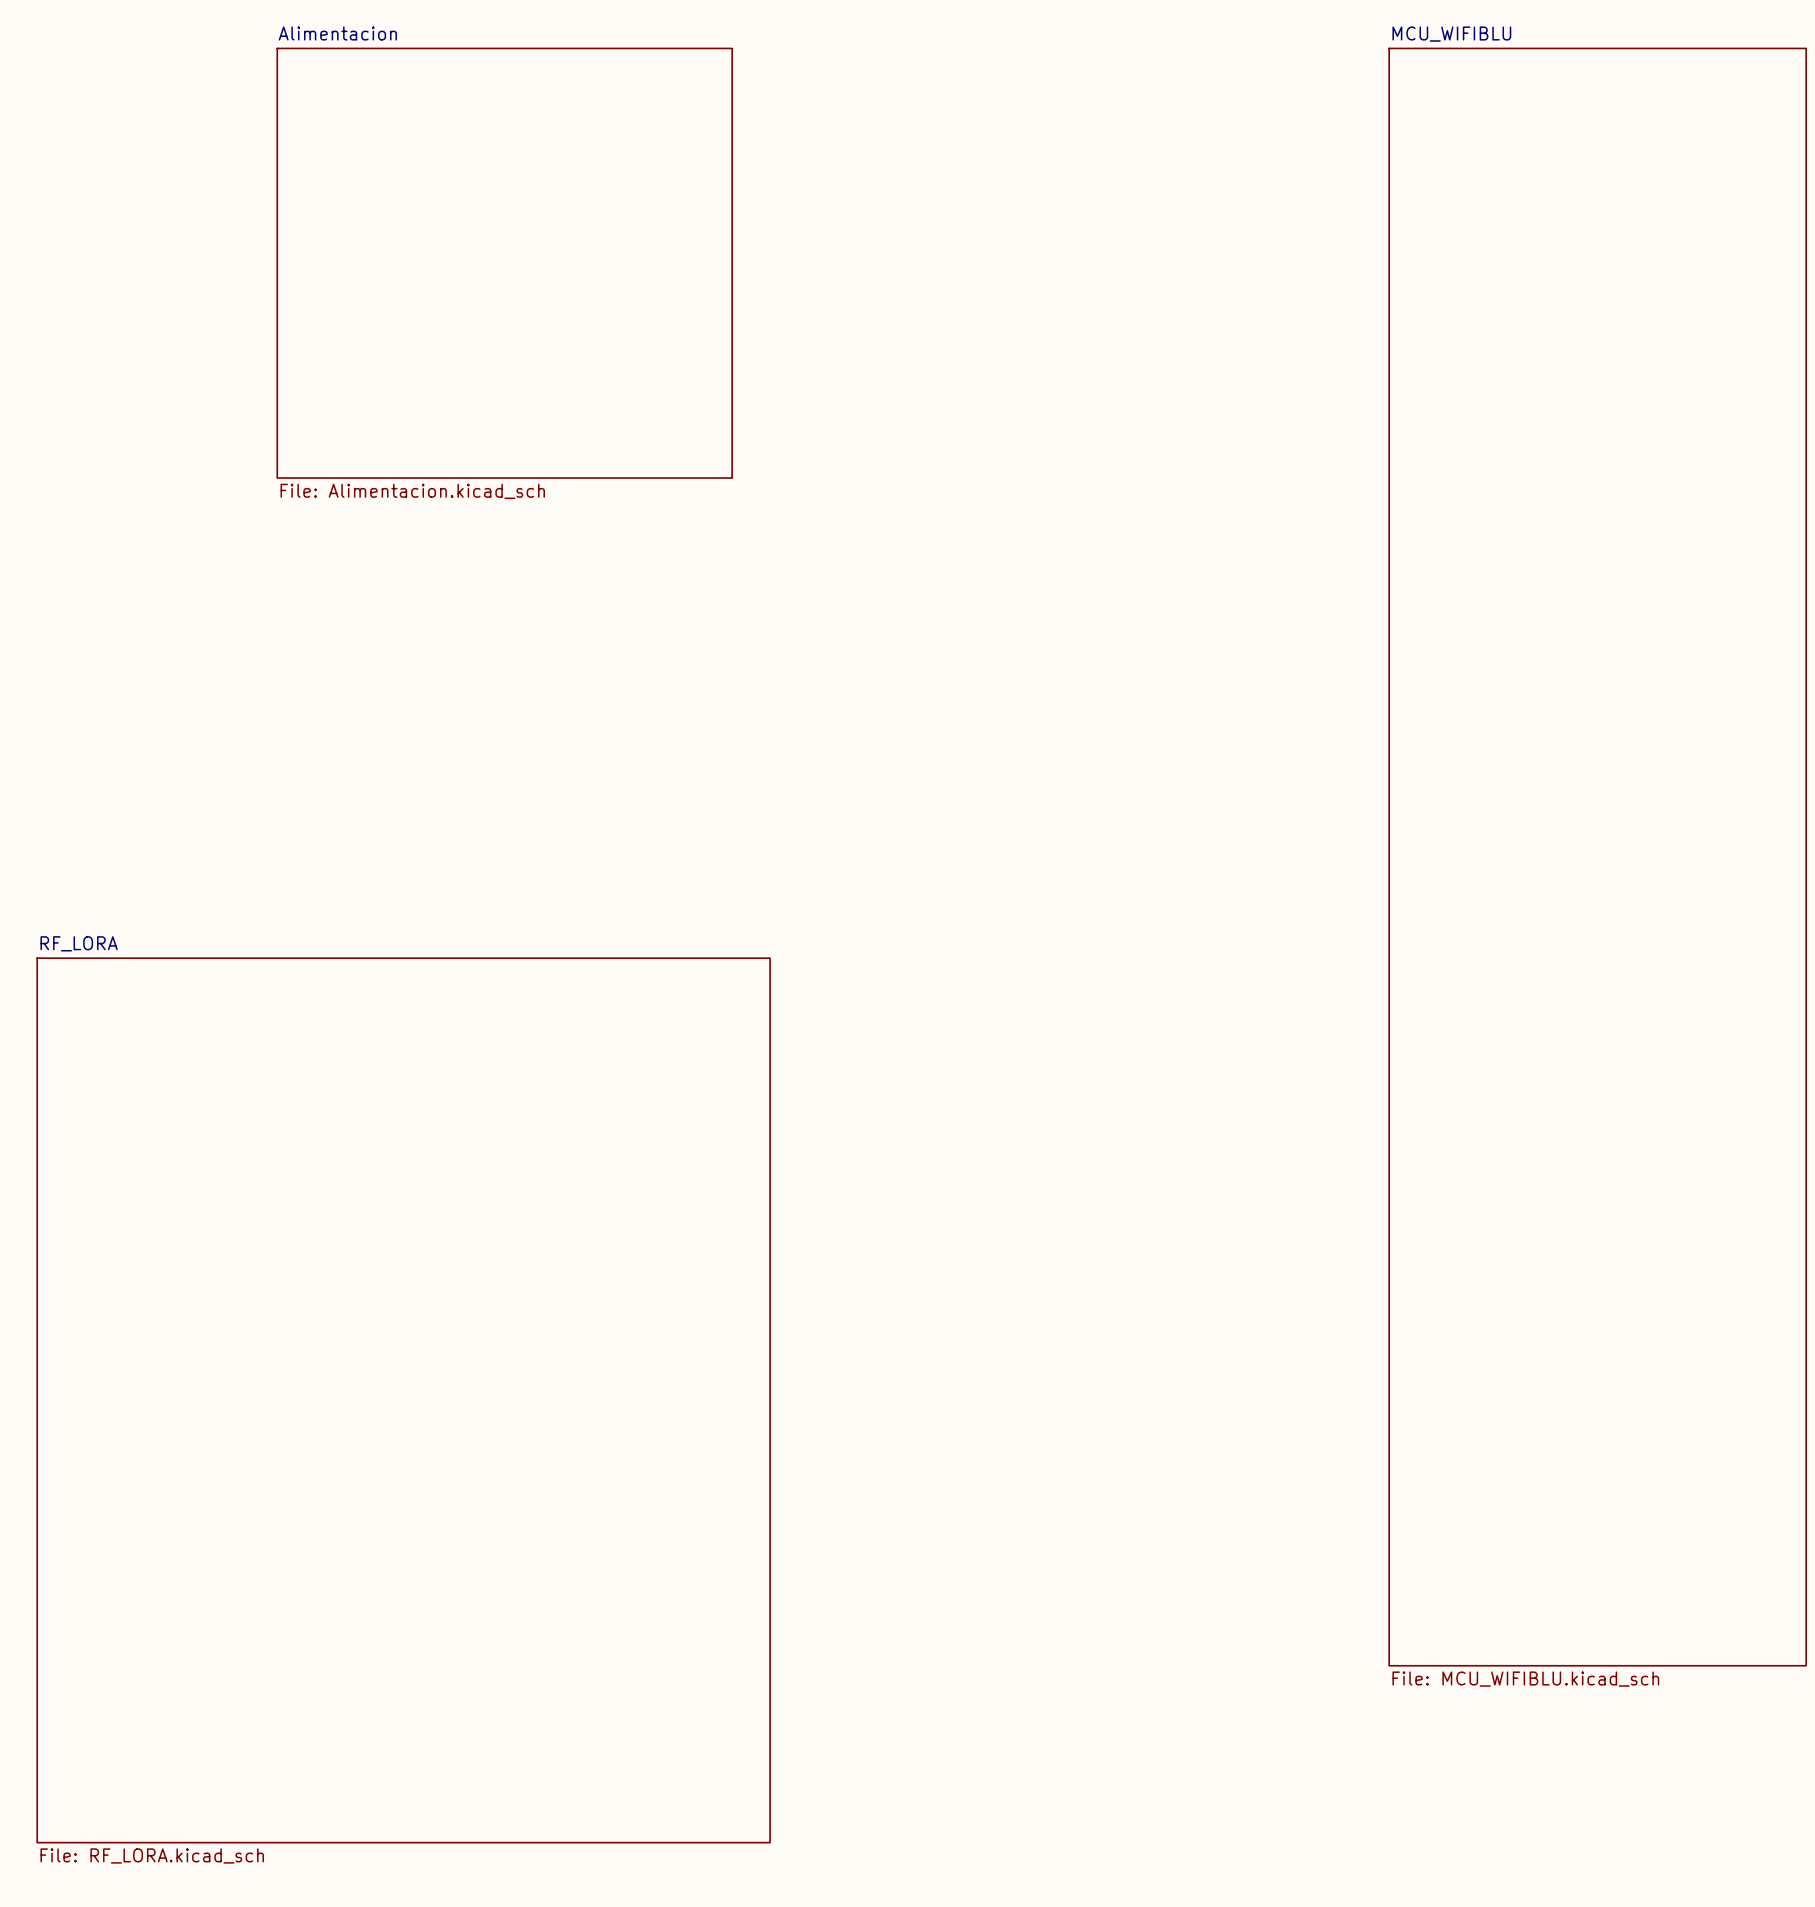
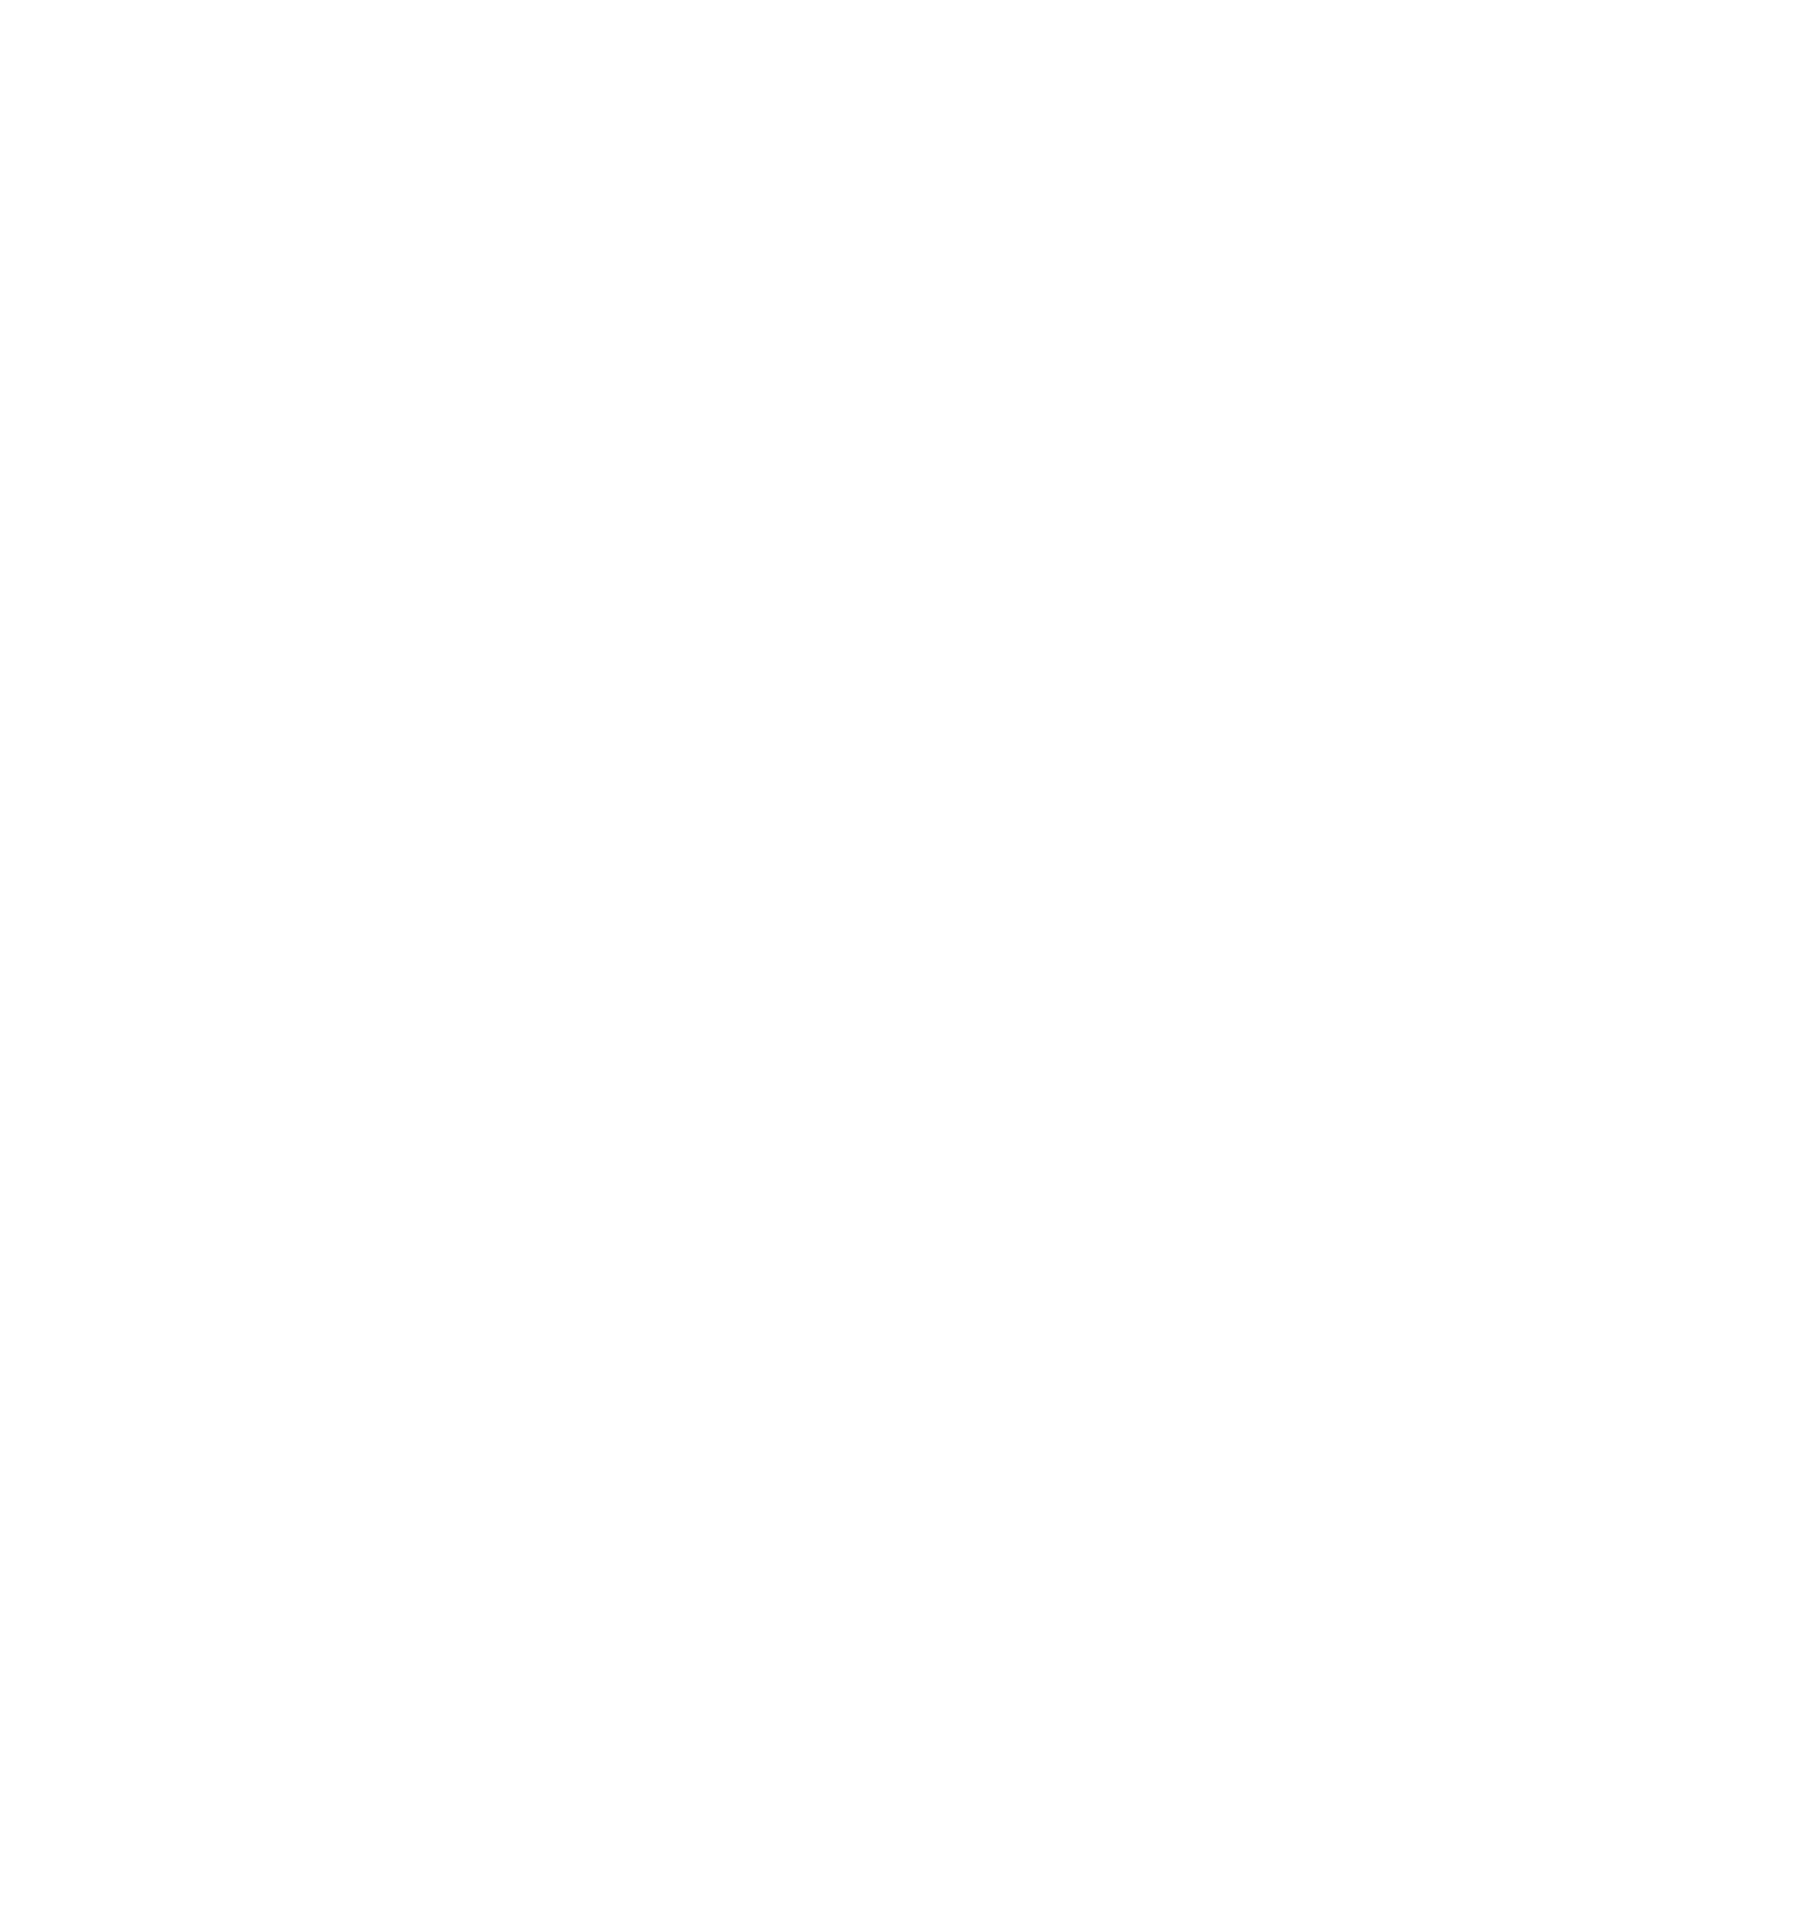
sheet Alimentacion: File: Alimentacion.kicad_sch (504, 263) -> none
sheet MCU_WIFIBLU: File: MCU_WIFIBLU.kicad_sch (1597, 857) -> none
sheet RF_LORA: File: RF_LORA.kicad_sch (403, 1400) -> none

